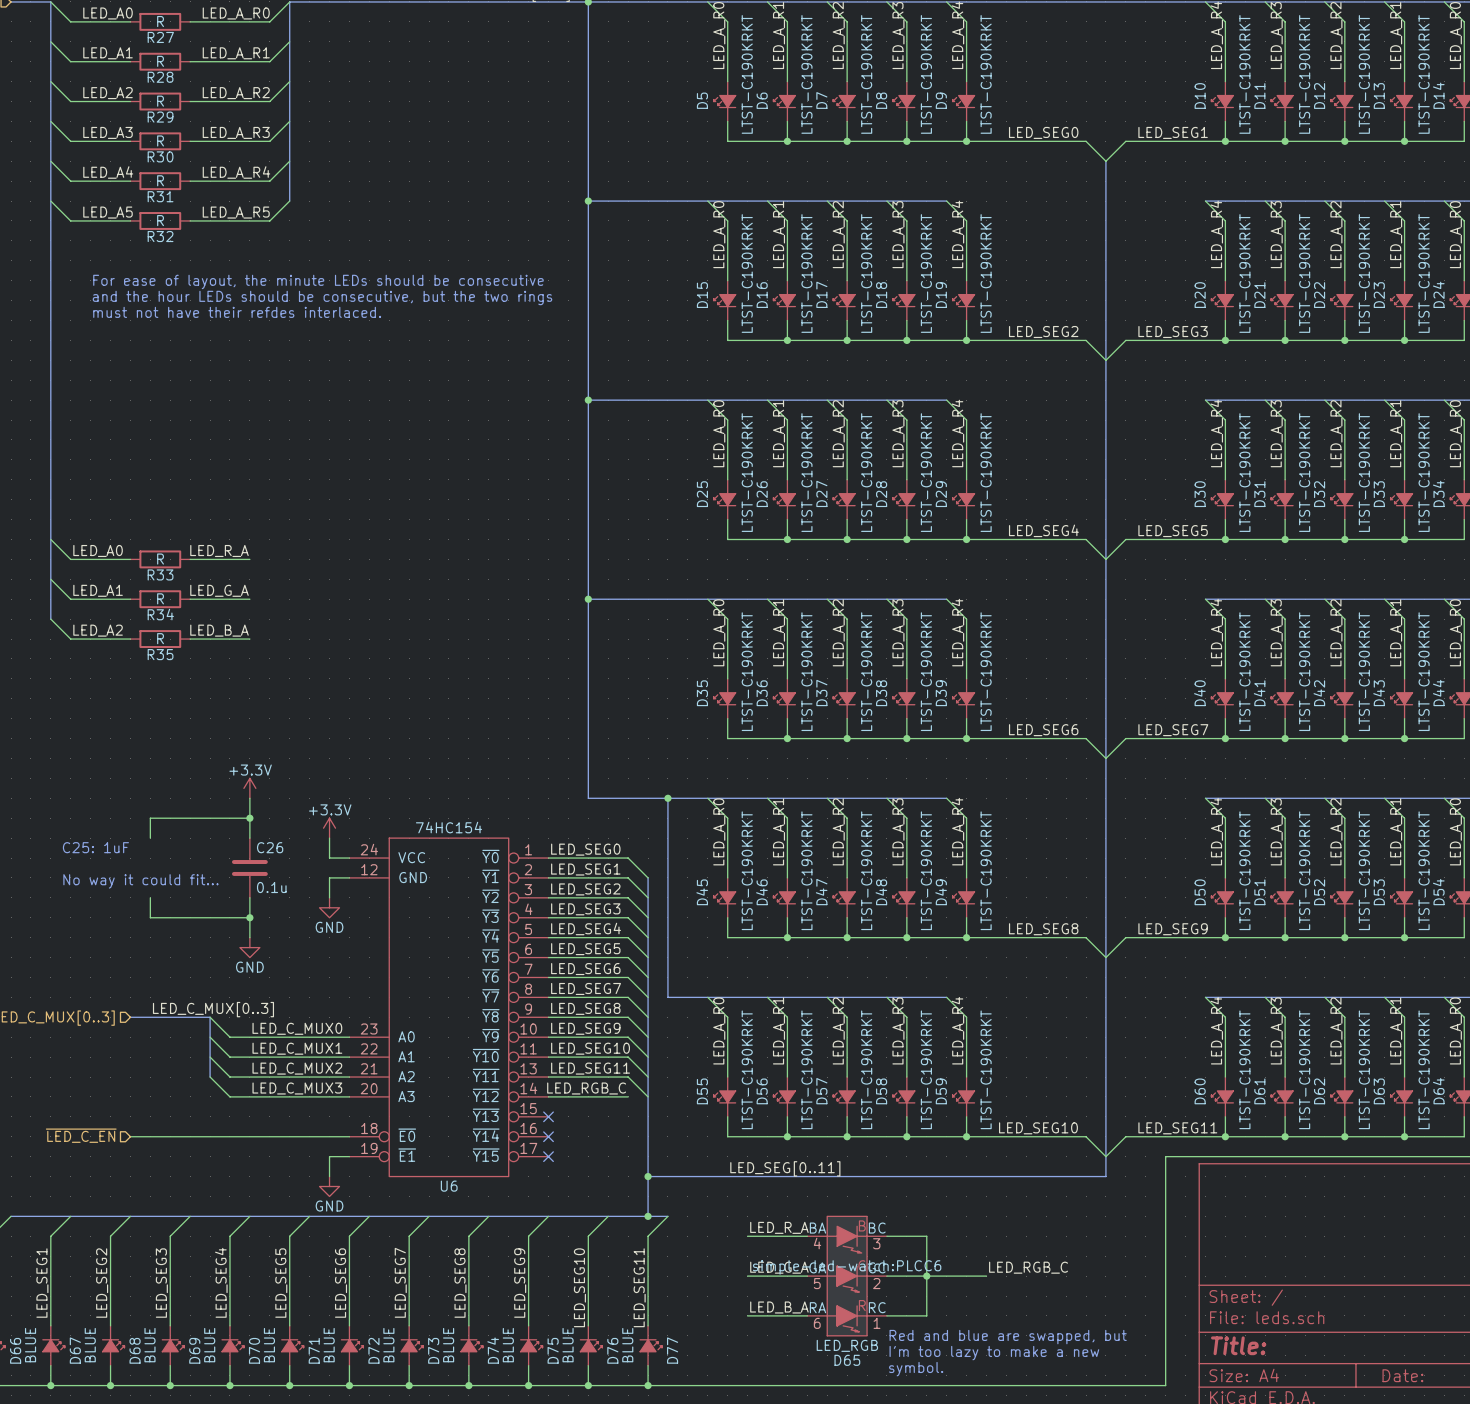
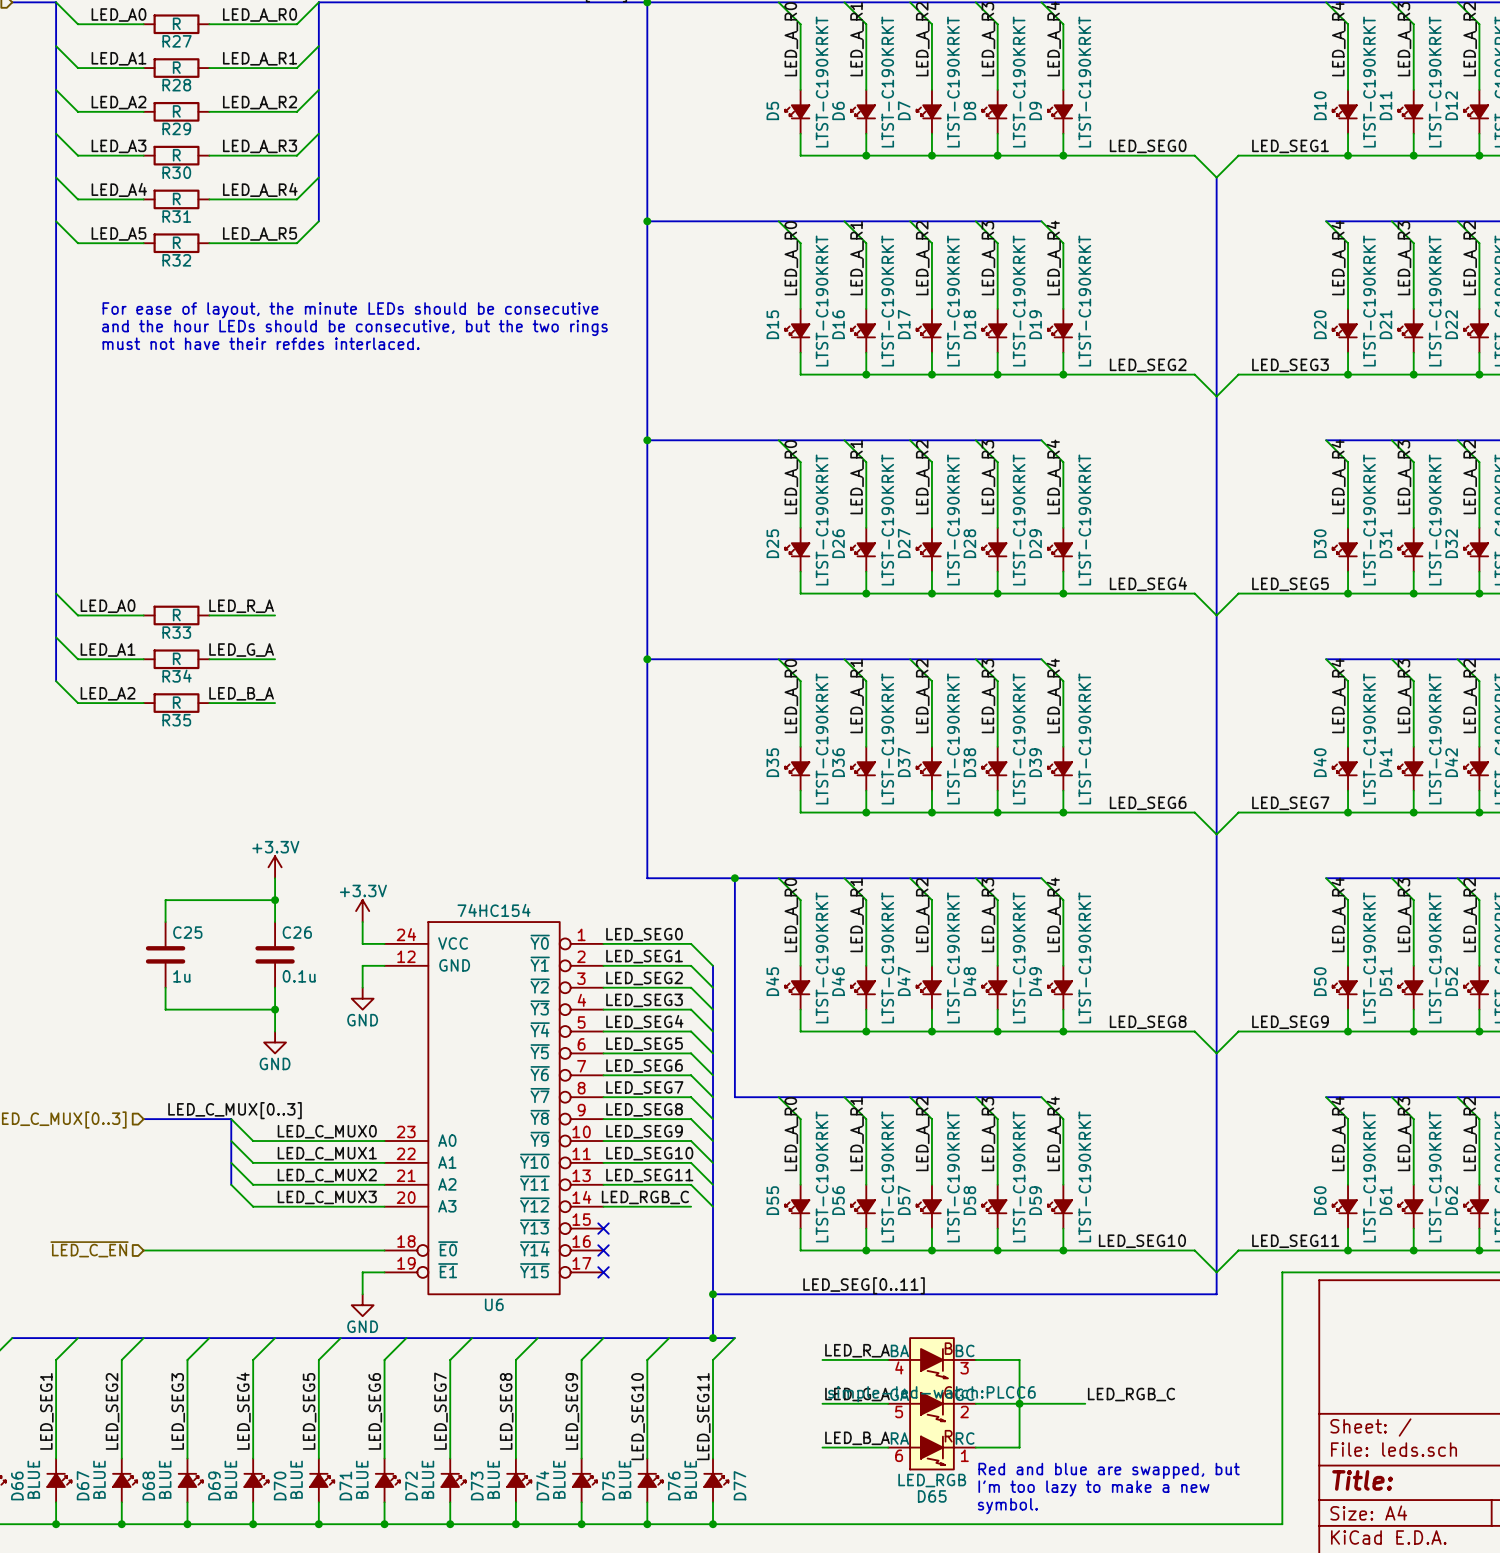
text: C25: 1uF (95, 847) -> none
C25: none -> 1u (165, 954)
text: No way it could fit... (140, 881) -> none

